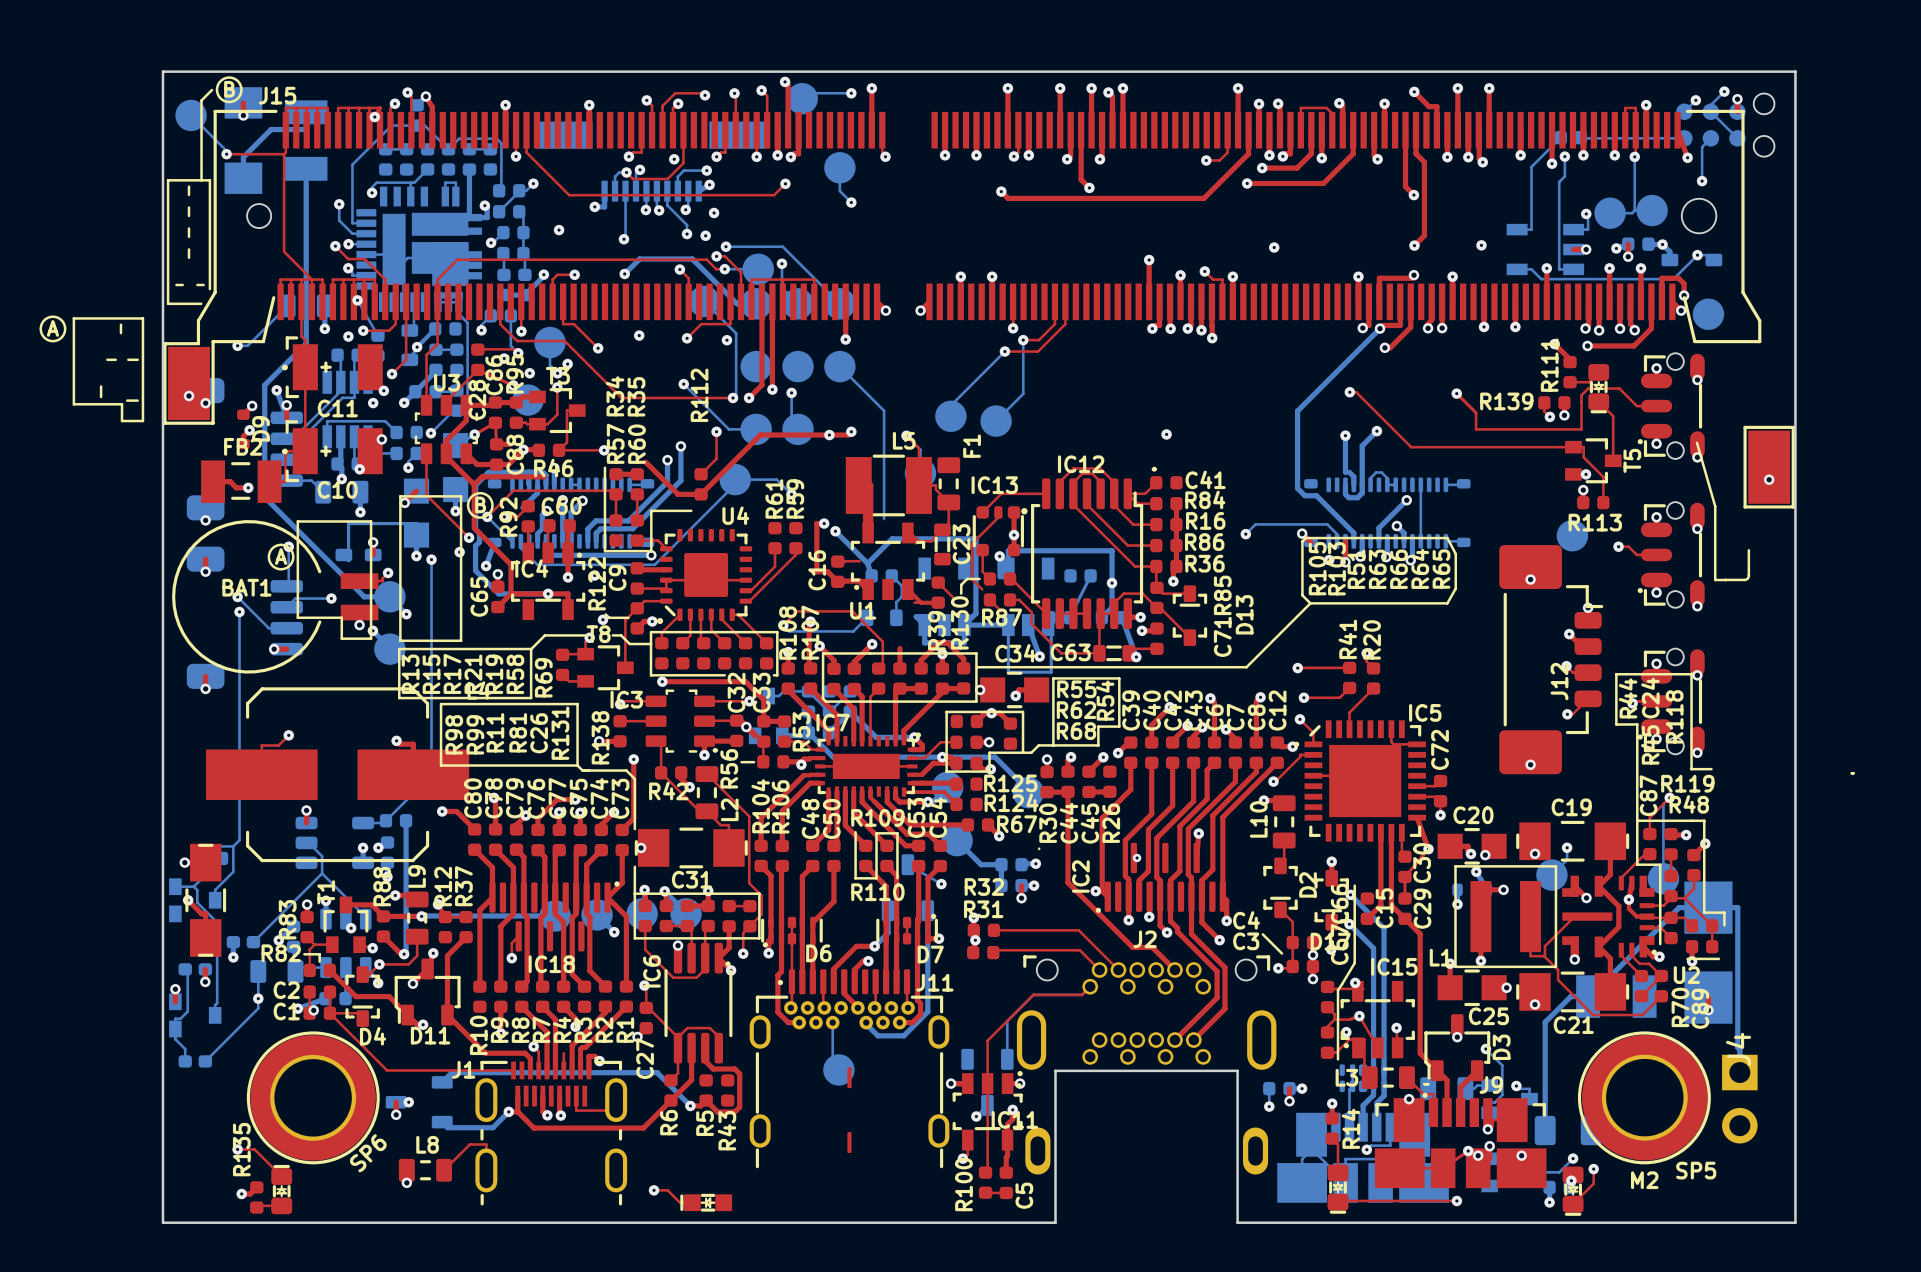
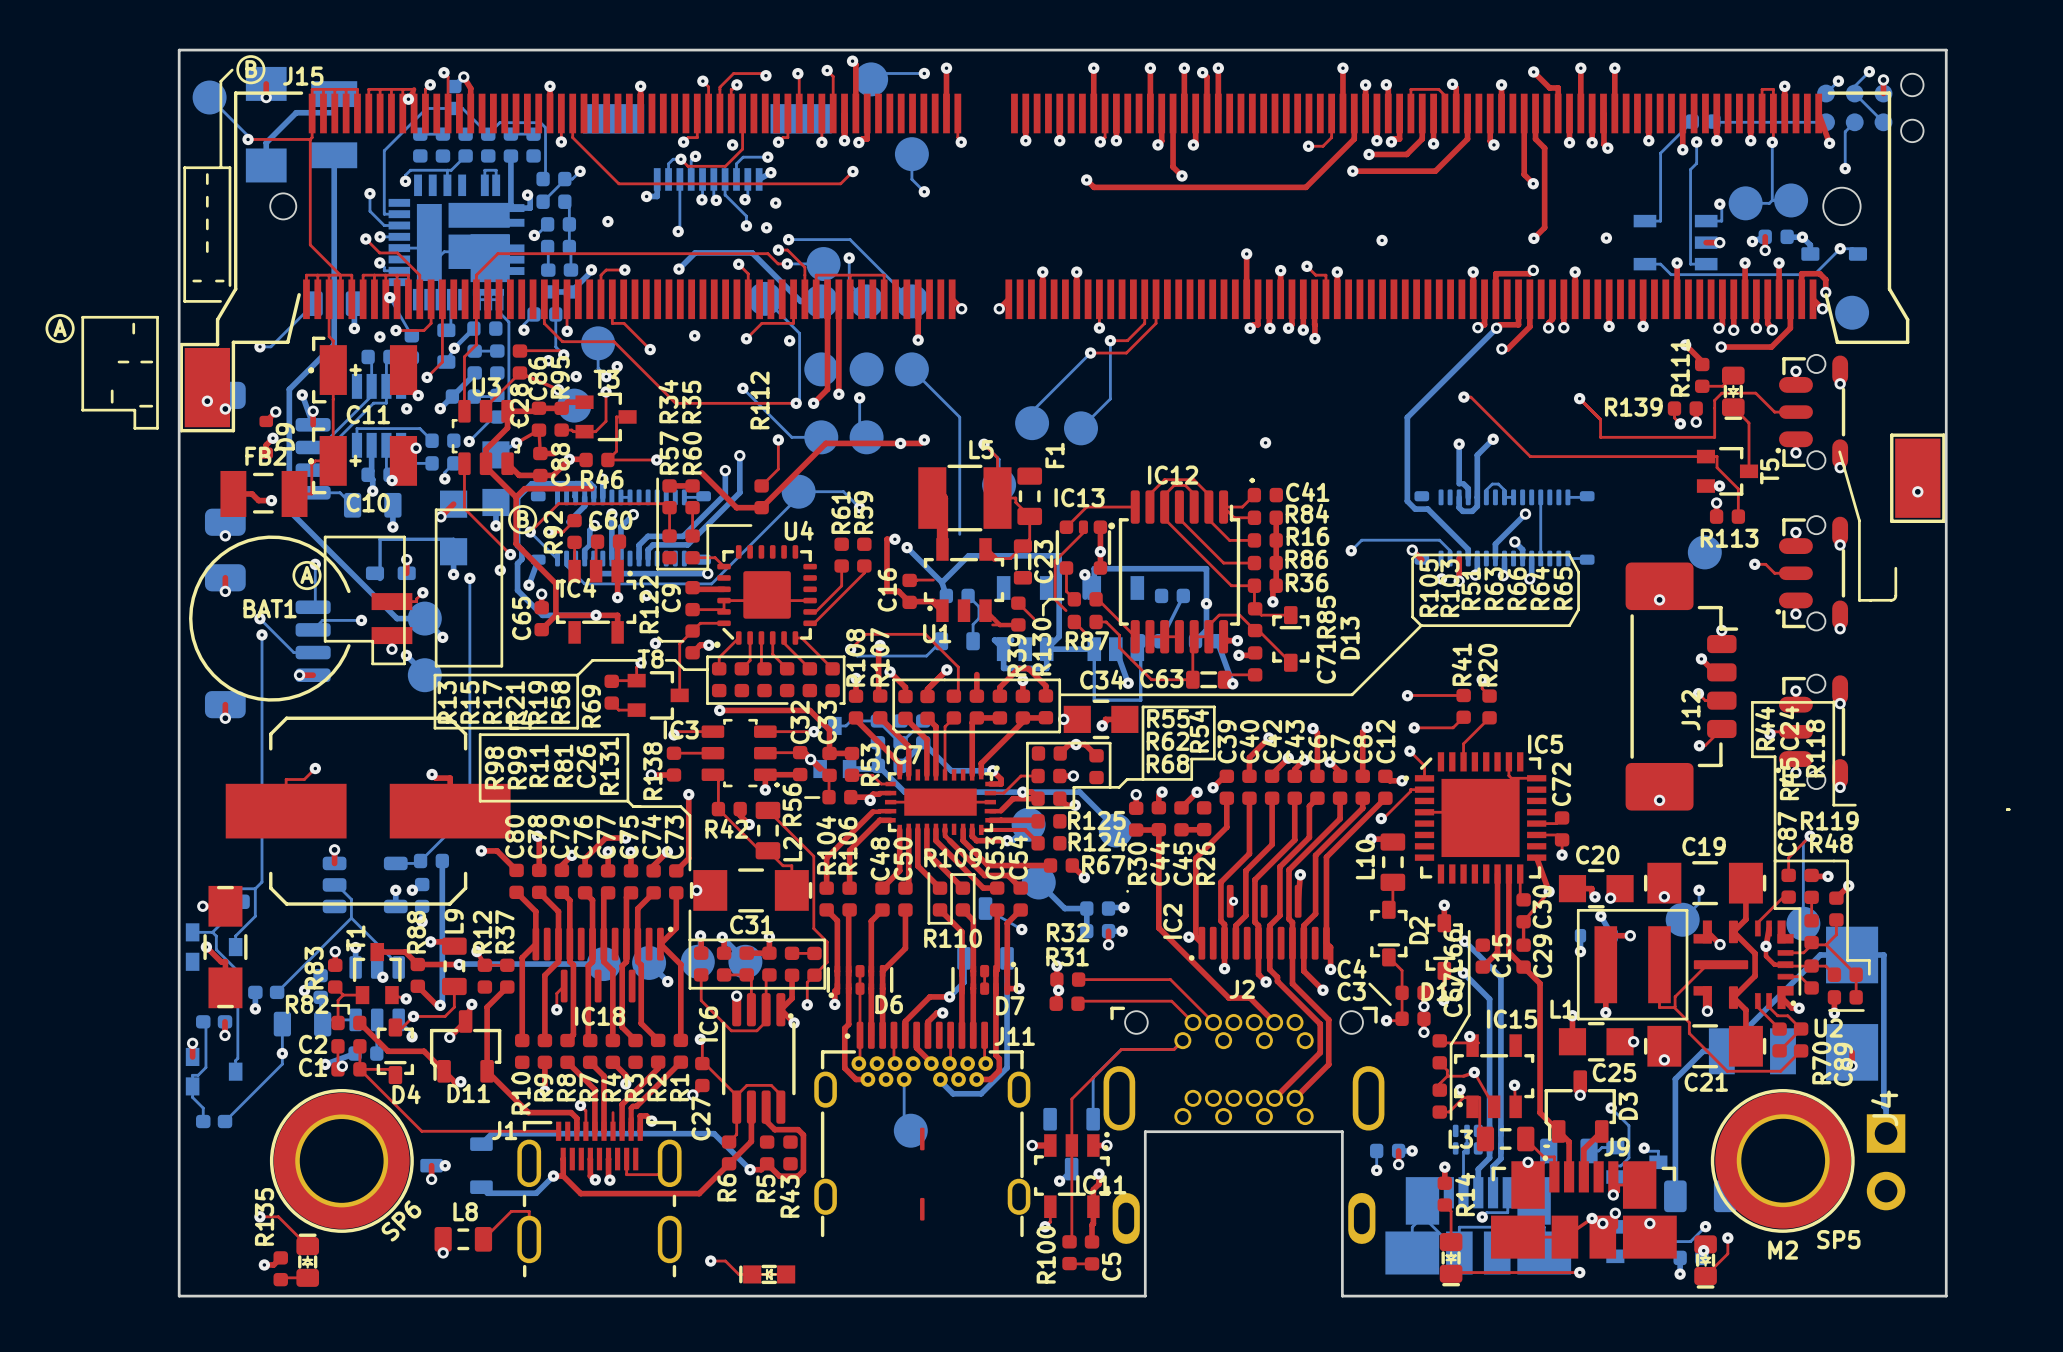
via: (1149, 916) -> none

